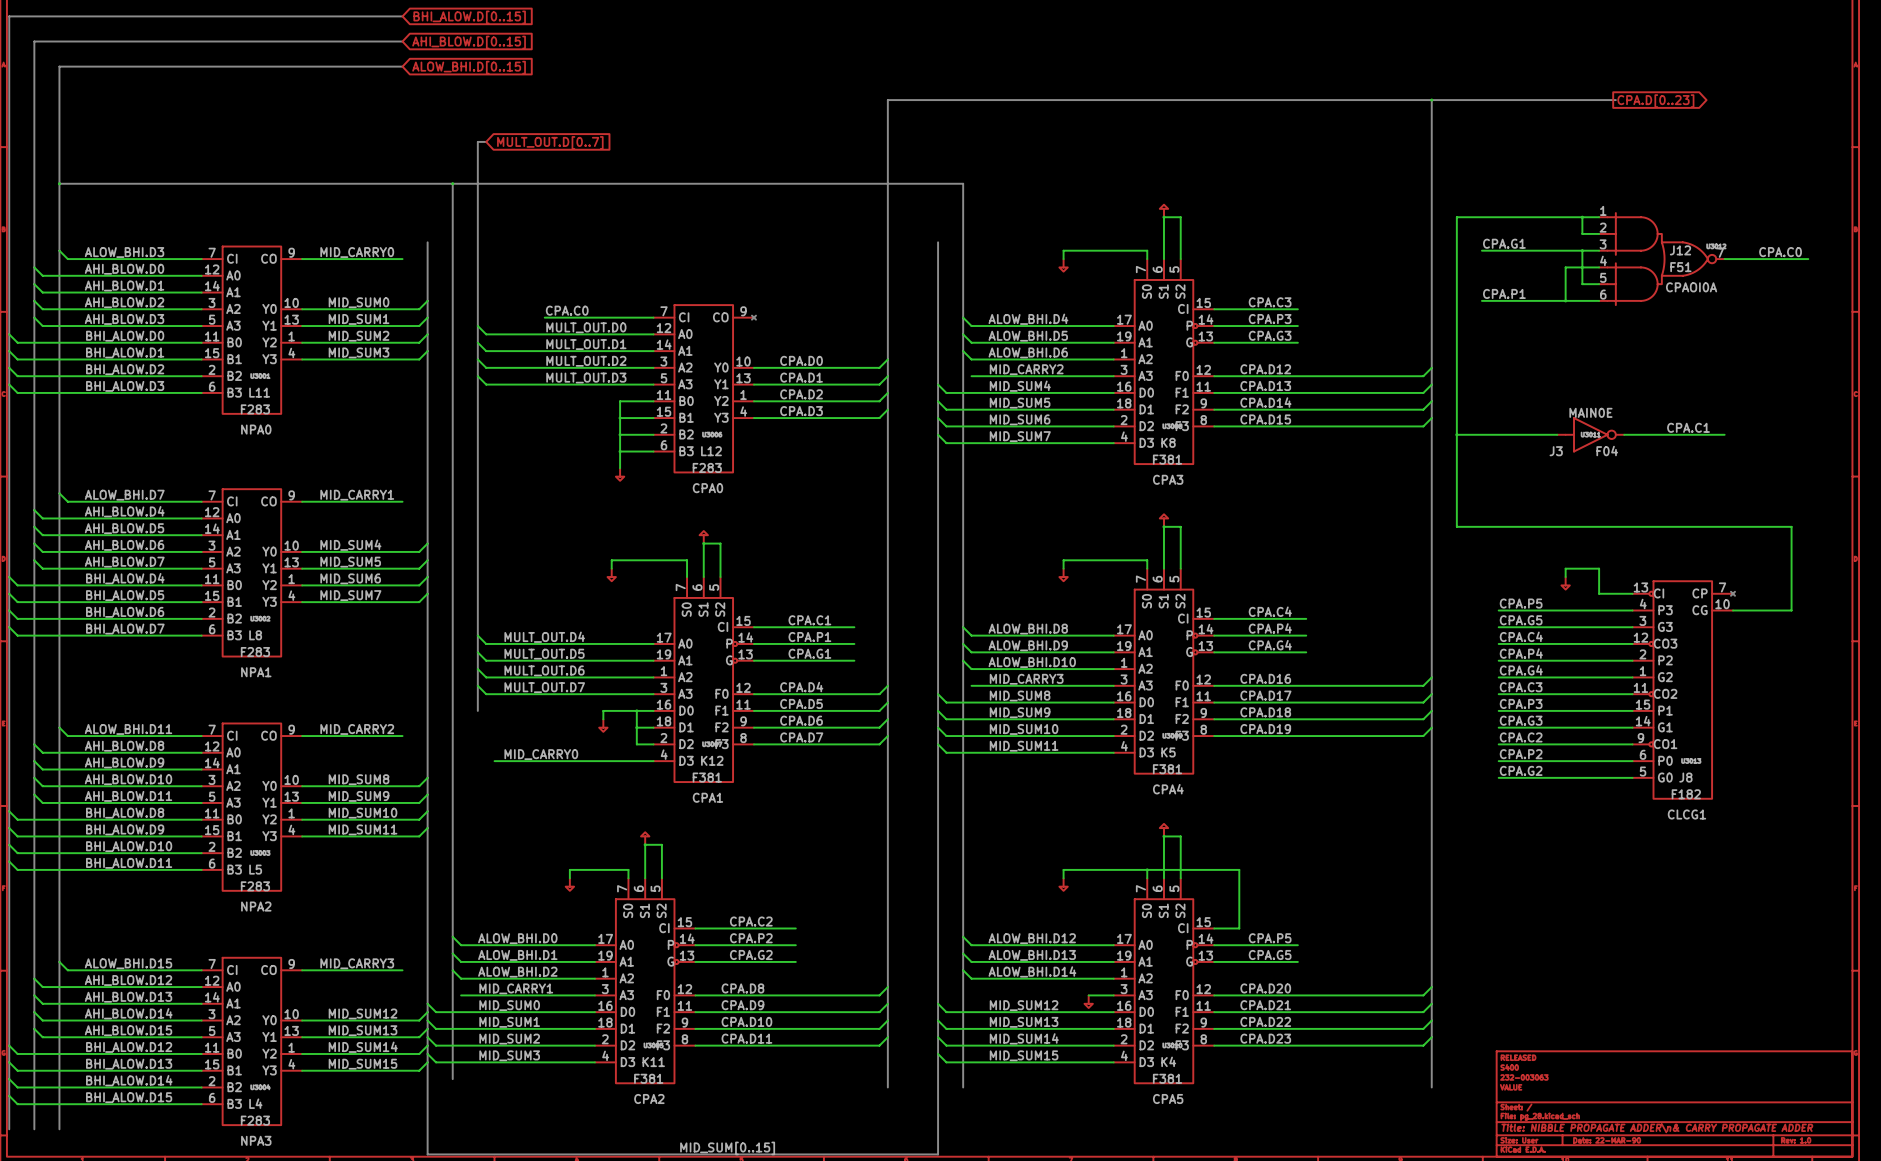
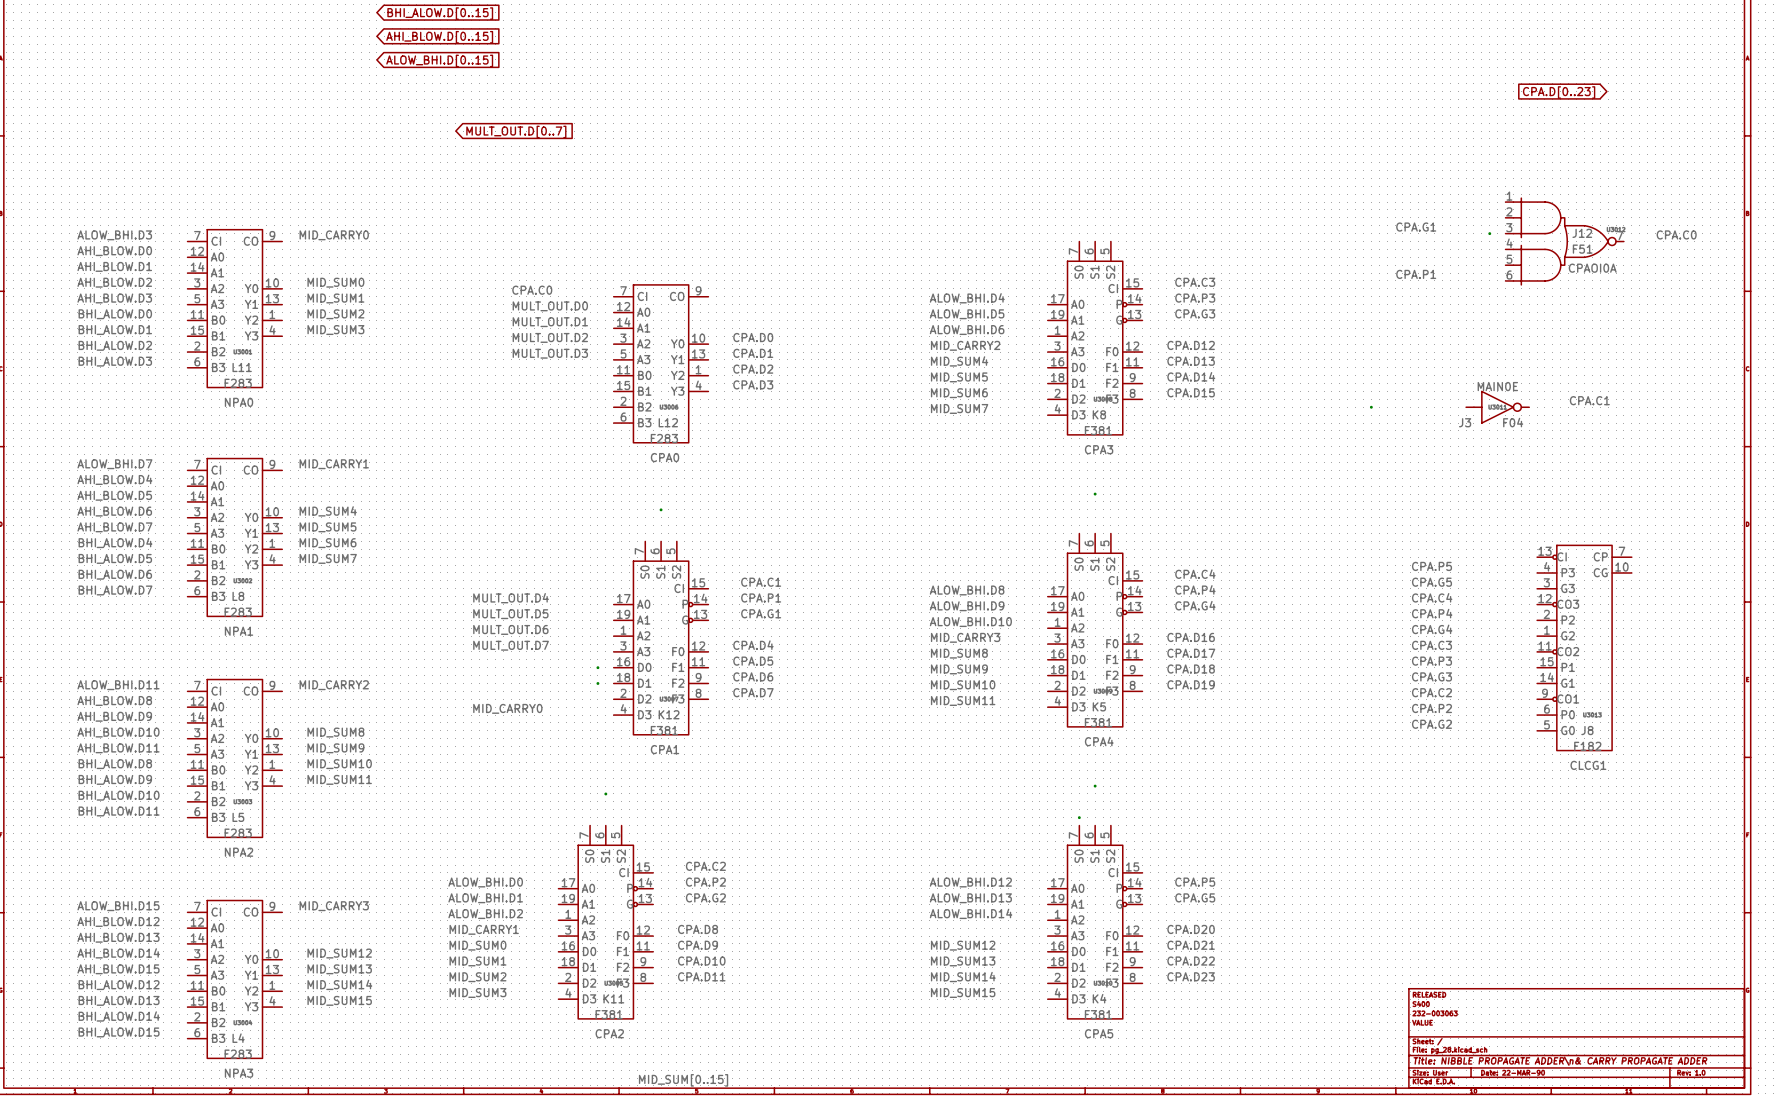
bus: (402, 16) (9, 16) (9, 1129) -> none
bus: (402, 41) (34, 41) (34, 1129) -> none
bus: (402, 66) (59, 66) (59, 1129) -> none
bus: (1431, 100) (1431, 1087) -> none
junction: (1431, 100) -> none
bus: (1615, 100) (887, 100) (887, 1087) -> none
bus: (486, 141) (477, 141) (477, 710) -> none
bus: (59, 183) (963, 183) (963, 1087) -> none
junction: (59, 183) -> none
bus: (452, 183) (452, 1079) -> none
junction: (452, 183) -> none
power symbol: (1163, 210) -> none
wire: (1582, 217) (1582, 233) (1599, 233) -> none
wire: (1599, 217) (1456, 217) (1456, 526) (1791, 526) (1791, 610) (1732, 610) -> none
bus: (427, 242) (427, 1154) (938, 1154) (938, 242) -> none
wire: (59, 250) (67, 259) (201, 259) -> none
wire: (1481, 250) (1599, 250) -> none
wire: (1582, 250) (1582, 284) (1599, 284) -> none
wire: (302, 259) (402, 259) -> none
wire: (1063, 259) (1063, 250) (1147, 250) (1147, 259) -> none
wire: (1163, 259) (1163, 217) (1180, 217) (1180, 259) -> none
wire: (1724, 259) (1808, 259) -> none
power symbol: (1063, 265) -> none
wire: (34, 267) (42, 275) (201, 275) -> none
wire: (1599, 267) (1565, 267) (1565, 300) -> none
wire: (34, 284) (42, 292) (201, 292) -> none
wire: (34, 300) (42, 309) (201, 309) -> none
wire: (427, 300) (419, 309) (302, 309) -> none
wire: (1481, 300) (1599, 300) -> none
wire: (1214, 309) (1297, 309) -> none
wire: (34, 317) (42, 326) (201, 326) -> none
wire: (427, 317) (419, 326) (302, 326) -> none
wire: (544, 317) (653, 317) -> none
no-connect mark: (753, 317) -> none
wire: (963, 317) (971, 326) (1113, 326) -> none
wire: (477, 326) (486, 334) (653, 334) -> none
wire: (1214, 326) (1297, 326) -> none
wire: (9, 334) (17, 342) (201, 342) -> none
wire: (427, 334) (419, 342) (302, 342) -> none
wire: (963, 334) (971, 342) (1113, 342) -> none
wire: (477, 342) (486, 351) (653, 351) -> none
wire: (1214, 342) (1297, 342) -> none
wire: (9, 351) (17, 359) (201, 359) -> none
wire: (427, 351) (419, 359) (302, 359) -> none
wire: (963, 351) (971, 359) (1113, 359) -> none
wire: (477, 359) (486, 367) (653, 367) -> none
wire: (887, 359) (879, 367) (753, 367) -> none
wire: (9, 367) (17, 376) (201, 376) -> none
wire: (1431, 367) (1423, 376) (1214, 376) -> none
wire: (477, 376) (486, 384) (653, 384) -> none
wire: (887, 376) (879, 384) (753, 384) -> none
wire: (971, 376) (1113, 376) -> none
wire: (9, 384) (17, 392) (201, 392) -> none
wire: (938, 384) (946, 392) (1113, 392) -> none
wire: (1431, 384) (1423, 392) (1214, 392) -> none
wire: (887, 392) (879, 401) (753, 401) -> none
wire: (653, 401) (620, 401) (620, 468) -> none
wire: (938, 401) (946, 409) (1113, 409) -> none
wire: (1431, 401) (1423, 409) (1214, 409) -> none
wire: (887, 409) (879, 418) (753, 418) -> none
wire: (620, 418) (653, 418) -> none
wire: (938, 418) (946, 426) (1113, 426) -> none
wire: (1431, 418) (1423, 426) (1214, 426) -> none
wire: (620, 434) (653, 434) -> none
wire: (938, 434) (946, 443) (1113, 443) -> none
wire: (1456, 434) (1557, 434) -> none
wire: (1624, 434) (1724, 434) -> none
wire: (620, 451) (653, 451) -> none
power symbol: (620, 474) -> none
wire: (59, 493) (67, 501) (201, 501) -> none
wire: (302, 501) (402, 501) -> none
wire: (34, 510) (42, 518) (201, 518) -> none
power symbol: (1163, 520) -> none
wire: (34, 526) (42, 535) (201, 535) -> none
power symbol: (703, 537) -> none
wire: (34, 543) (42, 551) (201, 551) -> none
wire: (427, 543) (419, 551) (302, 551) -> none
wire: (34, 560) (42, 568) (201, 568) -> none
wire: (427, 560) (419, 568) (302, 568) -> none
wire: (611, 568) (611, 560) (687, 560) (687, 577) -> none
wire: (1063, 568) (1063, 560) (1147, 560) (1147, 568) -> none
wire: (1163, 568) (1163, 526) (1180, 526) (1180, 568) -> none
power symbol: (611, 575) -> none
power symbol: (1063, 575) -> none
wire: (9, 577) (17, 585) (201, 585) -> none
wire: (427, 577) (419, 585) (302, 585) -> none
wire: (703, 577) (703, 543) (720, 543) (720, 577) -> none
wire: (1565, 577) (1565, 568) (1599, 568) (1599, 593) (1632, 593) -> none
power symbol: (1565, 583) -> none
wire: (9, 593) (17, 602) (201, 602) -> none
wire: (427, 593) (419, 602) (302, 602) -> none
no-connect mark: (1732, 593) -> none
wire: (9, 610) (17, 618) (201, 618) -> none
wire: (1498, 610) (1632, 610) -> none
wire: (1214, 618) (1306, 618) -> none
wire: (9, 627) (17, 635) (201, 635) -> none
wire: (753, 627) (854, 627) -> none
wire: (963, 627) (971, 635) (1113, 635) -> none
wire: (1498, 627) (1632, 627) -> none
wire: (477, 635) (486, 643) (653, 643) -> none
wire: (1214, 635) (1306, 635) -> none
wire: (753, 643) (854, 643) -> none
wire: (963, 643) (971, 652) (1113, 652) -> none
wire: (1498, 643) (1632, 643) -> none
wire: (477, 652) (486, 660) (653, 660) -> none
wire: (1214, 652) (1306, 652) -> none
wire: (753, 660) (854, 660) -> none
wire: (963, 660) (971, 669) (1113, 669) -> none
wire: (1498, 660) (1632, 660) -> none
wire: (477, 669) (486, 677) (653, 677) -> none
wire: (1431, 677) (1423, 685) (1214, 685) -> none
wire: (1498, 677) (1632, 677) -> none
wire: (477, 685) (486, 694) (653, 694) -> none
wire: (887, 685) (879, 694) (753, 694) -> none
wire: (971, 685) (1113, 685) -> none
wire: (938, 694) (946, 702) (1113, 702) -> none
wire: (1431, 694) (1423, 702) (1214, 702) -> none
wire: (1498, 694) (1632, 694) -> none
wire: (887, 702) (879, 710) (753, 710) -> none
wire: (636, 710) (636, 744) (653, 744) -> none
wire: (653, 710) (603, 710) (603, 719) -> none
wire: (938, 710) (946, 719) (1113, 719) -> none
wire: (1431, 710) (1423, 719) (1214, 719) -> none
wire: (1498, 710) (1632, 710) -> none
wire: (887, 719) (879, 727) (753, 727) -> none
power symbol: (603, 725) -> none
wire: (59, 727) (67, 736) (201, 736) -> none
wire: (636, 727) (653, 727) -> none
wire: (938, 727) (946, 736) (1113, 736) -> none
wire: (1431, 727) (1423, 736) (1214, 736) -> none
wire: (1498, 727) (1632, 727) -> none
wire: (302, 736) (402, 736) -> none
wire: (887, 736) (879, 744) (753, 744) -> none
wire: (34, 744) (42, 752) (201, 752) -> none
wire: (938, 744) (946, 752) (1113, 752) -> none
wire: (1498, 744) (1632, 744) -> none
wire: (34, 761) (42, 769) (201, 769) -> none
wire: (494, 761) (653, 761) -> none
wire: (1498, 761) (1632, 761) -> none
wire: (34, 777) (42, 786) (201, 786) -> none
wire: (427, 777) (419, 786) (302, 786) -> none
wire: (1498, 777) (1632, 777) -> none
wire: (34, 794) (42, 802) (201, 802) -> none
wire: (427, 794) (419, 802) (302, 802) -> none
wire: (9, 811) (17, 819) (201, 819) -> none
wire: (427, 811) (419, 819) (302, 819) -> none
wire: (9, 828) (17, 836) (201, 836) -> none
wire: (427, 828) (419, 836) (302, 836) -> none
power symbol: (1163, 830) -> none
power symbol: (645, 838) -> none
wire: (9, 844) (17, 853) (201, 853) -> none
wire: (9, 861) (17, 869) (201, 869) -> none
wire: (1147, 869) (1147, 878) -> none
wire: (569, 878) (569, 869) (628, 869) (628, 878) -> none
wire: (645, 878) (645, 844) (661, 844) (661, 878) -> none
wire: (1063, 878) (1063, 869) (1239, 869) (1239, 928) (1214, 928) -> none
wire: (1163, 878) (1163, 836) (1180, 836) (1180, 878) -> none
power symbol: (569, 884) -> none
power symbol: (1063, 884) -> none
wire: (695, 928) (795, 928) -> none
wire: (452, 936) (461, 945) (594, 945) -> none
wire: (963, 936) (971, 945) (1113, 945) -> none
wire: (695, 945) (795, 945) -> none
wire: (1214, 945) (1297, 945) -> none
wire: (452, 953) (461, 961) (594, 961) -> none
wire: (963, 953) (971, 961) (1113, 961) -> none
wire: (59, 961) (67, 970) (201, 970) -> none
wire: (695, 961) (795, 961) -> none
wire: (1214, 961) (1297, 961) -> none
wire: (302, 970) (402, 970) -> none
wire: (452, 970) (461, 978) (594, 978) -> none
wire: (963, 970) (971, 978) (1113, 978) -> none
wire: (34, 978) (42, 987) (201, 987) -> none
wire: (887, 987) (879, 995) (695, 995) -> none
wire: (1431, 987) (1423, 995) (1214, 995) -> none
wire: (34, 995) (42, 1003) (201, 1003) -> none
wire: (461, 995) (594, 995) -> none
wire: (1088, 995) (1113, 995) -> none
power symbol: (1088, 1001) -> none
wire: (427, 1003) (436, 1012) (594, 1012) -> none
wire: (887, 1003) (879, 1012) (695, 1012) -> none
wire: (938, 1003) (946, 1012) (1113, 1012) -> none
wire: (1431, 1003) (1423, 1012) (1214, 1012) -> none
wire: (34, 1012) (42, 1020) (201, 1020) -> none
wire: (427, 1012) (419, 1020) (302, 1020) -> none
wire: (427, 1020) (436, 1028) (594, 1028) -> none
wire: (887, 1020) (879, 1028) (695, 1028) -> none
wire: (938, 1020) (946, 1028) (1113, 1028) -> none
wire: (1431, 1020) (1423, 1028) (1214, 1028) -> none
wire: (34, 1028) (42, 1037) (201, 1037) -> none
wire: (427, 1028) (419, 1037) (302, 1037) -> none
wire: (427, 1037) (436, 1045) (594, 1045) -> none
wire: (887, 1037) (879, 1045) (695, 1045) -> none
wire: (938, 1037) (946, 1045) (1113, 1045) -> none
wire: (1431, 1037) (1423, 1045) (1214, 1045) -> none
wire: (9, 1045) (17, 1054) (201, 1054) -> none
wire: (427, 1045) (419, 1054) (302, 1054) -> none
wire: (427, 1054) (436, 1062) (594, 1062) -> none
wire: (938, 1054) (946, 1062) (1113, 1062) -> none
wire: (9, 1062) (17, 1070) (201, 1070) -> none
wire: (427, 1062) (419, 1070) (302, 1070) -> none
wire: (9, 1079) (17, 1087) (201, 1087) -> none
wire: (9, 1095) (17, 1104) (201, 1104) -> none

